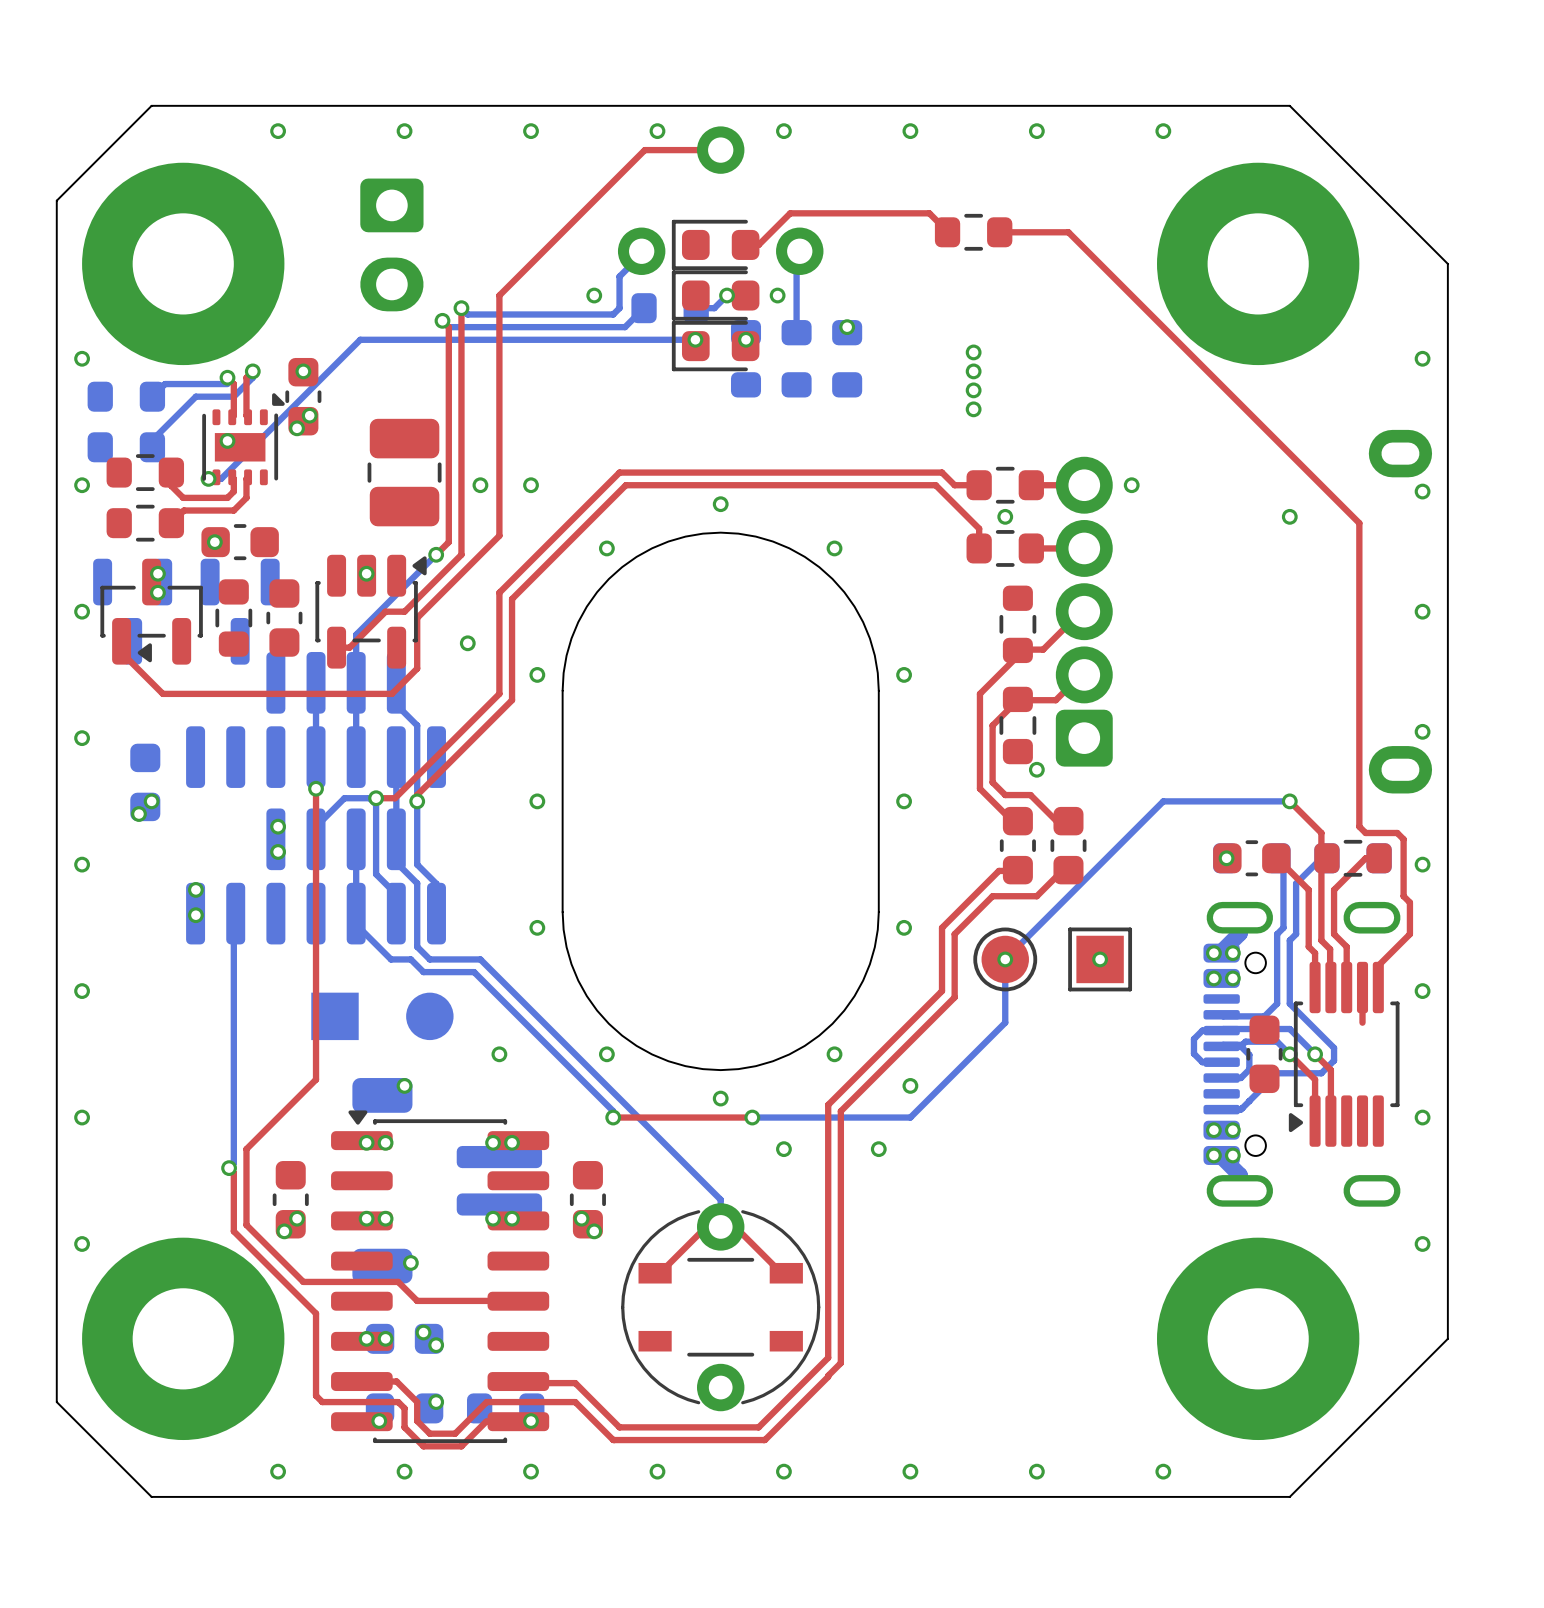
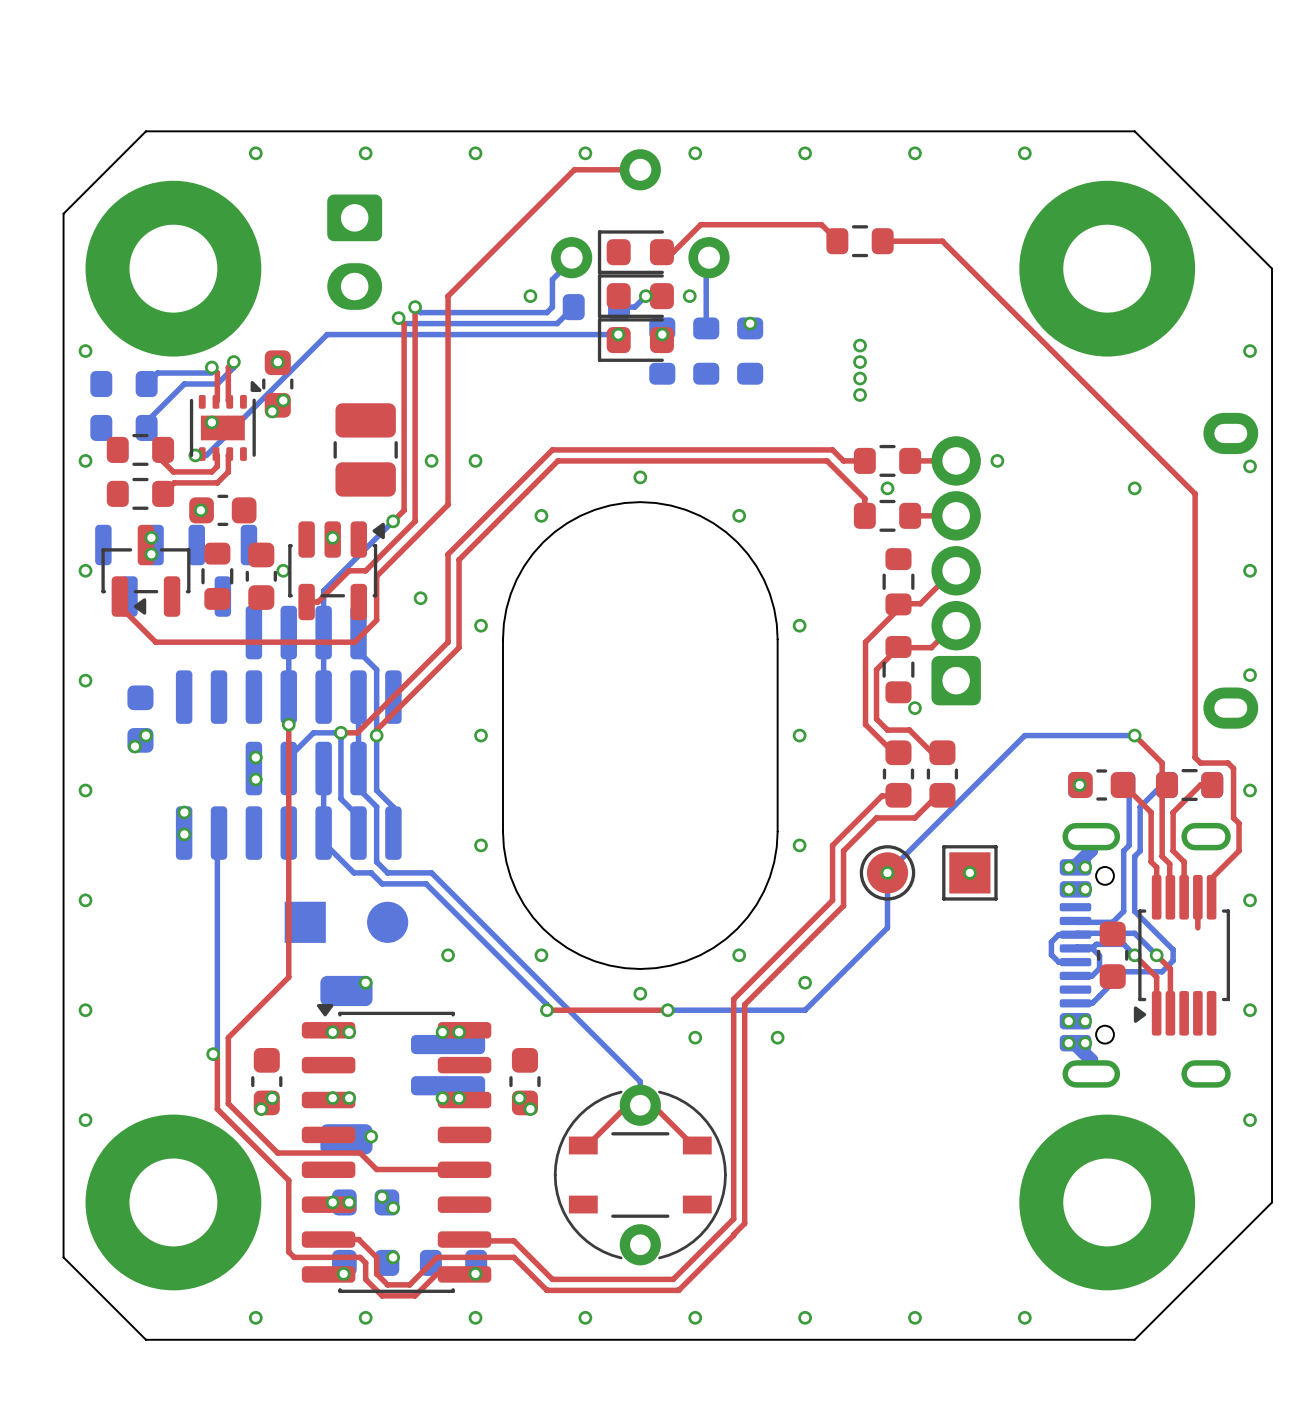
via: none -> (283, 570)

